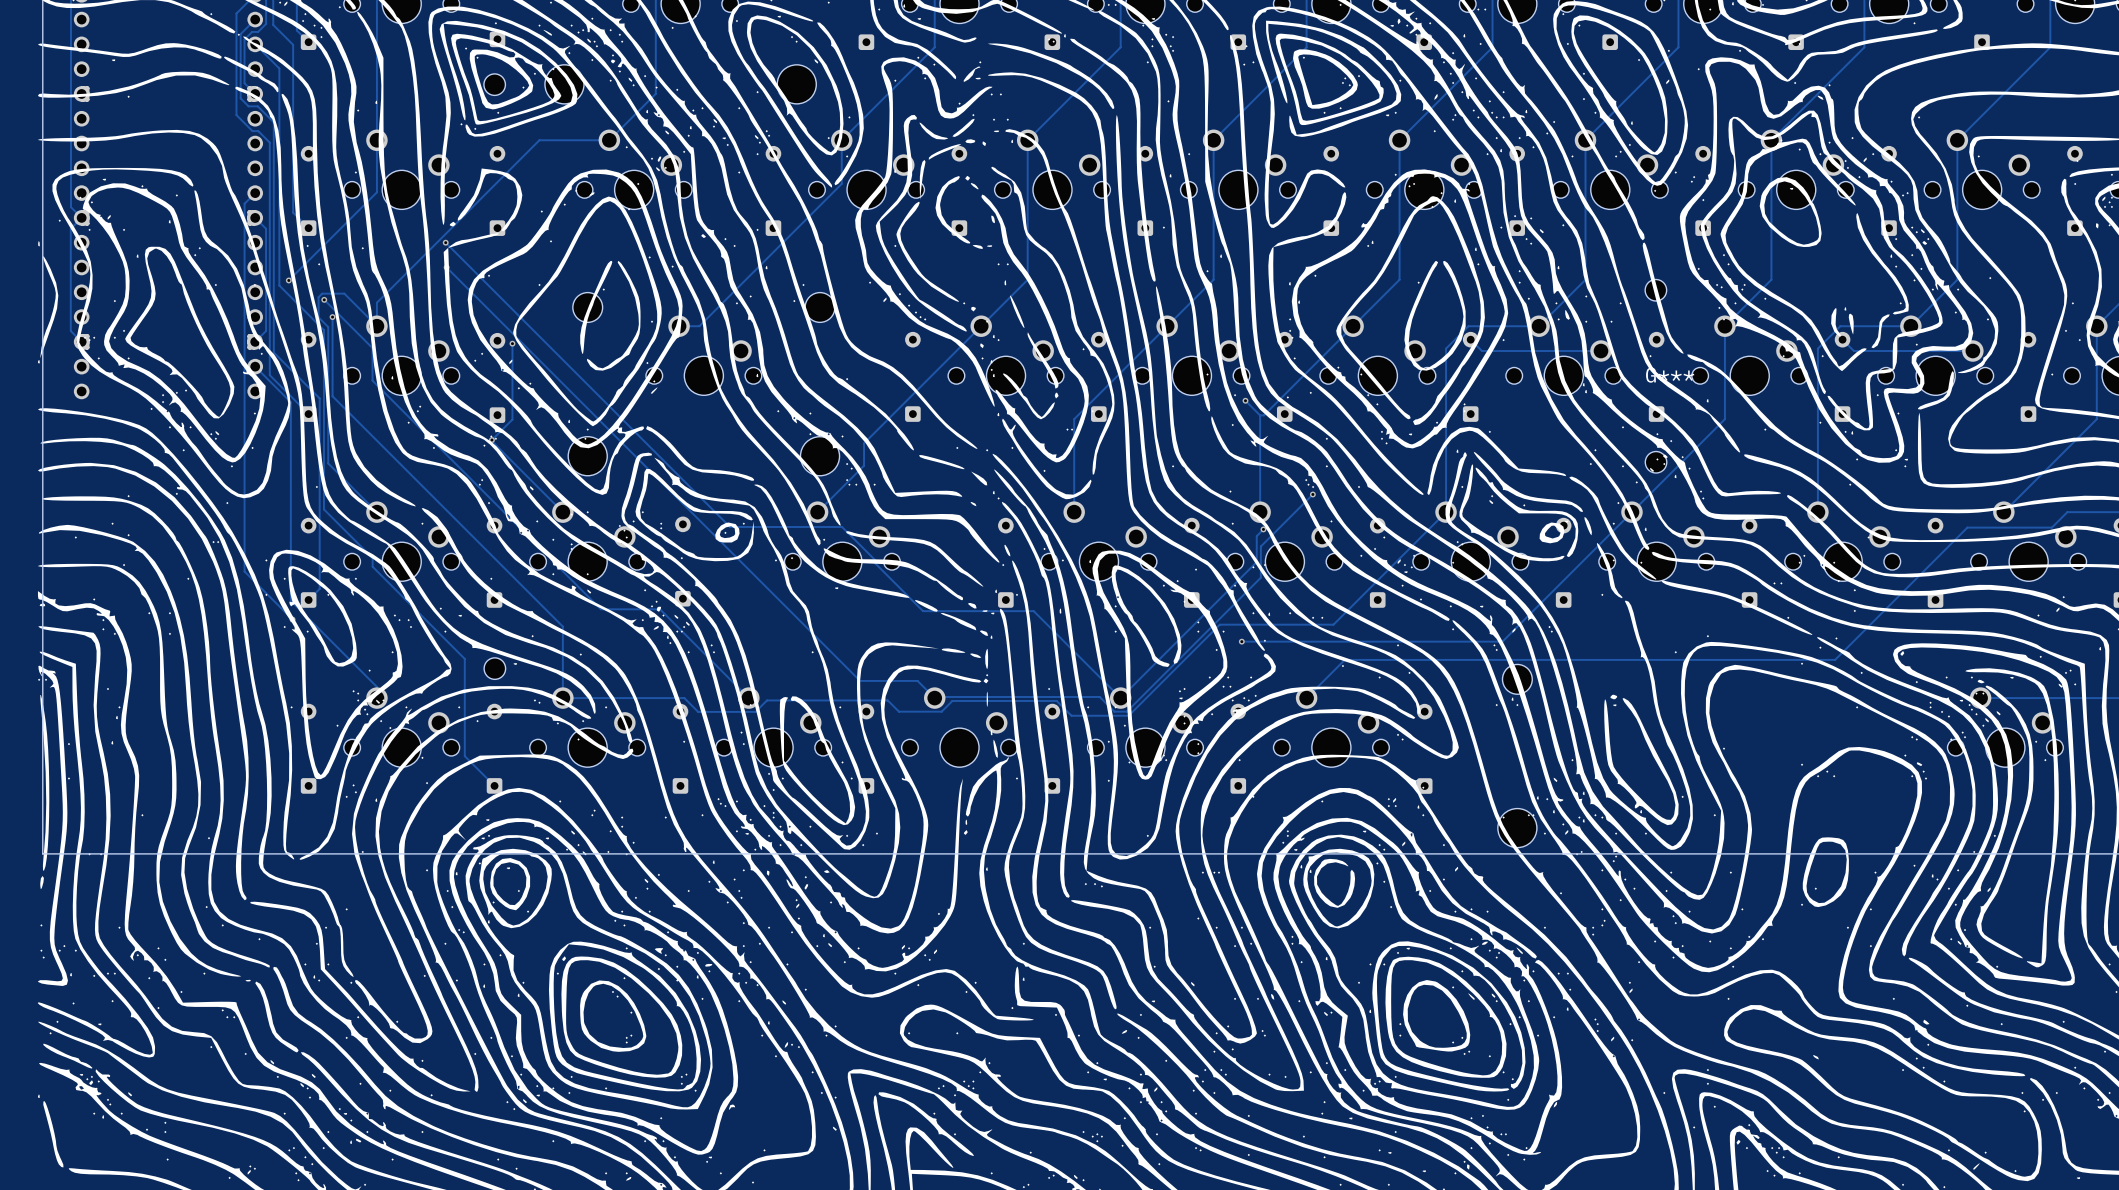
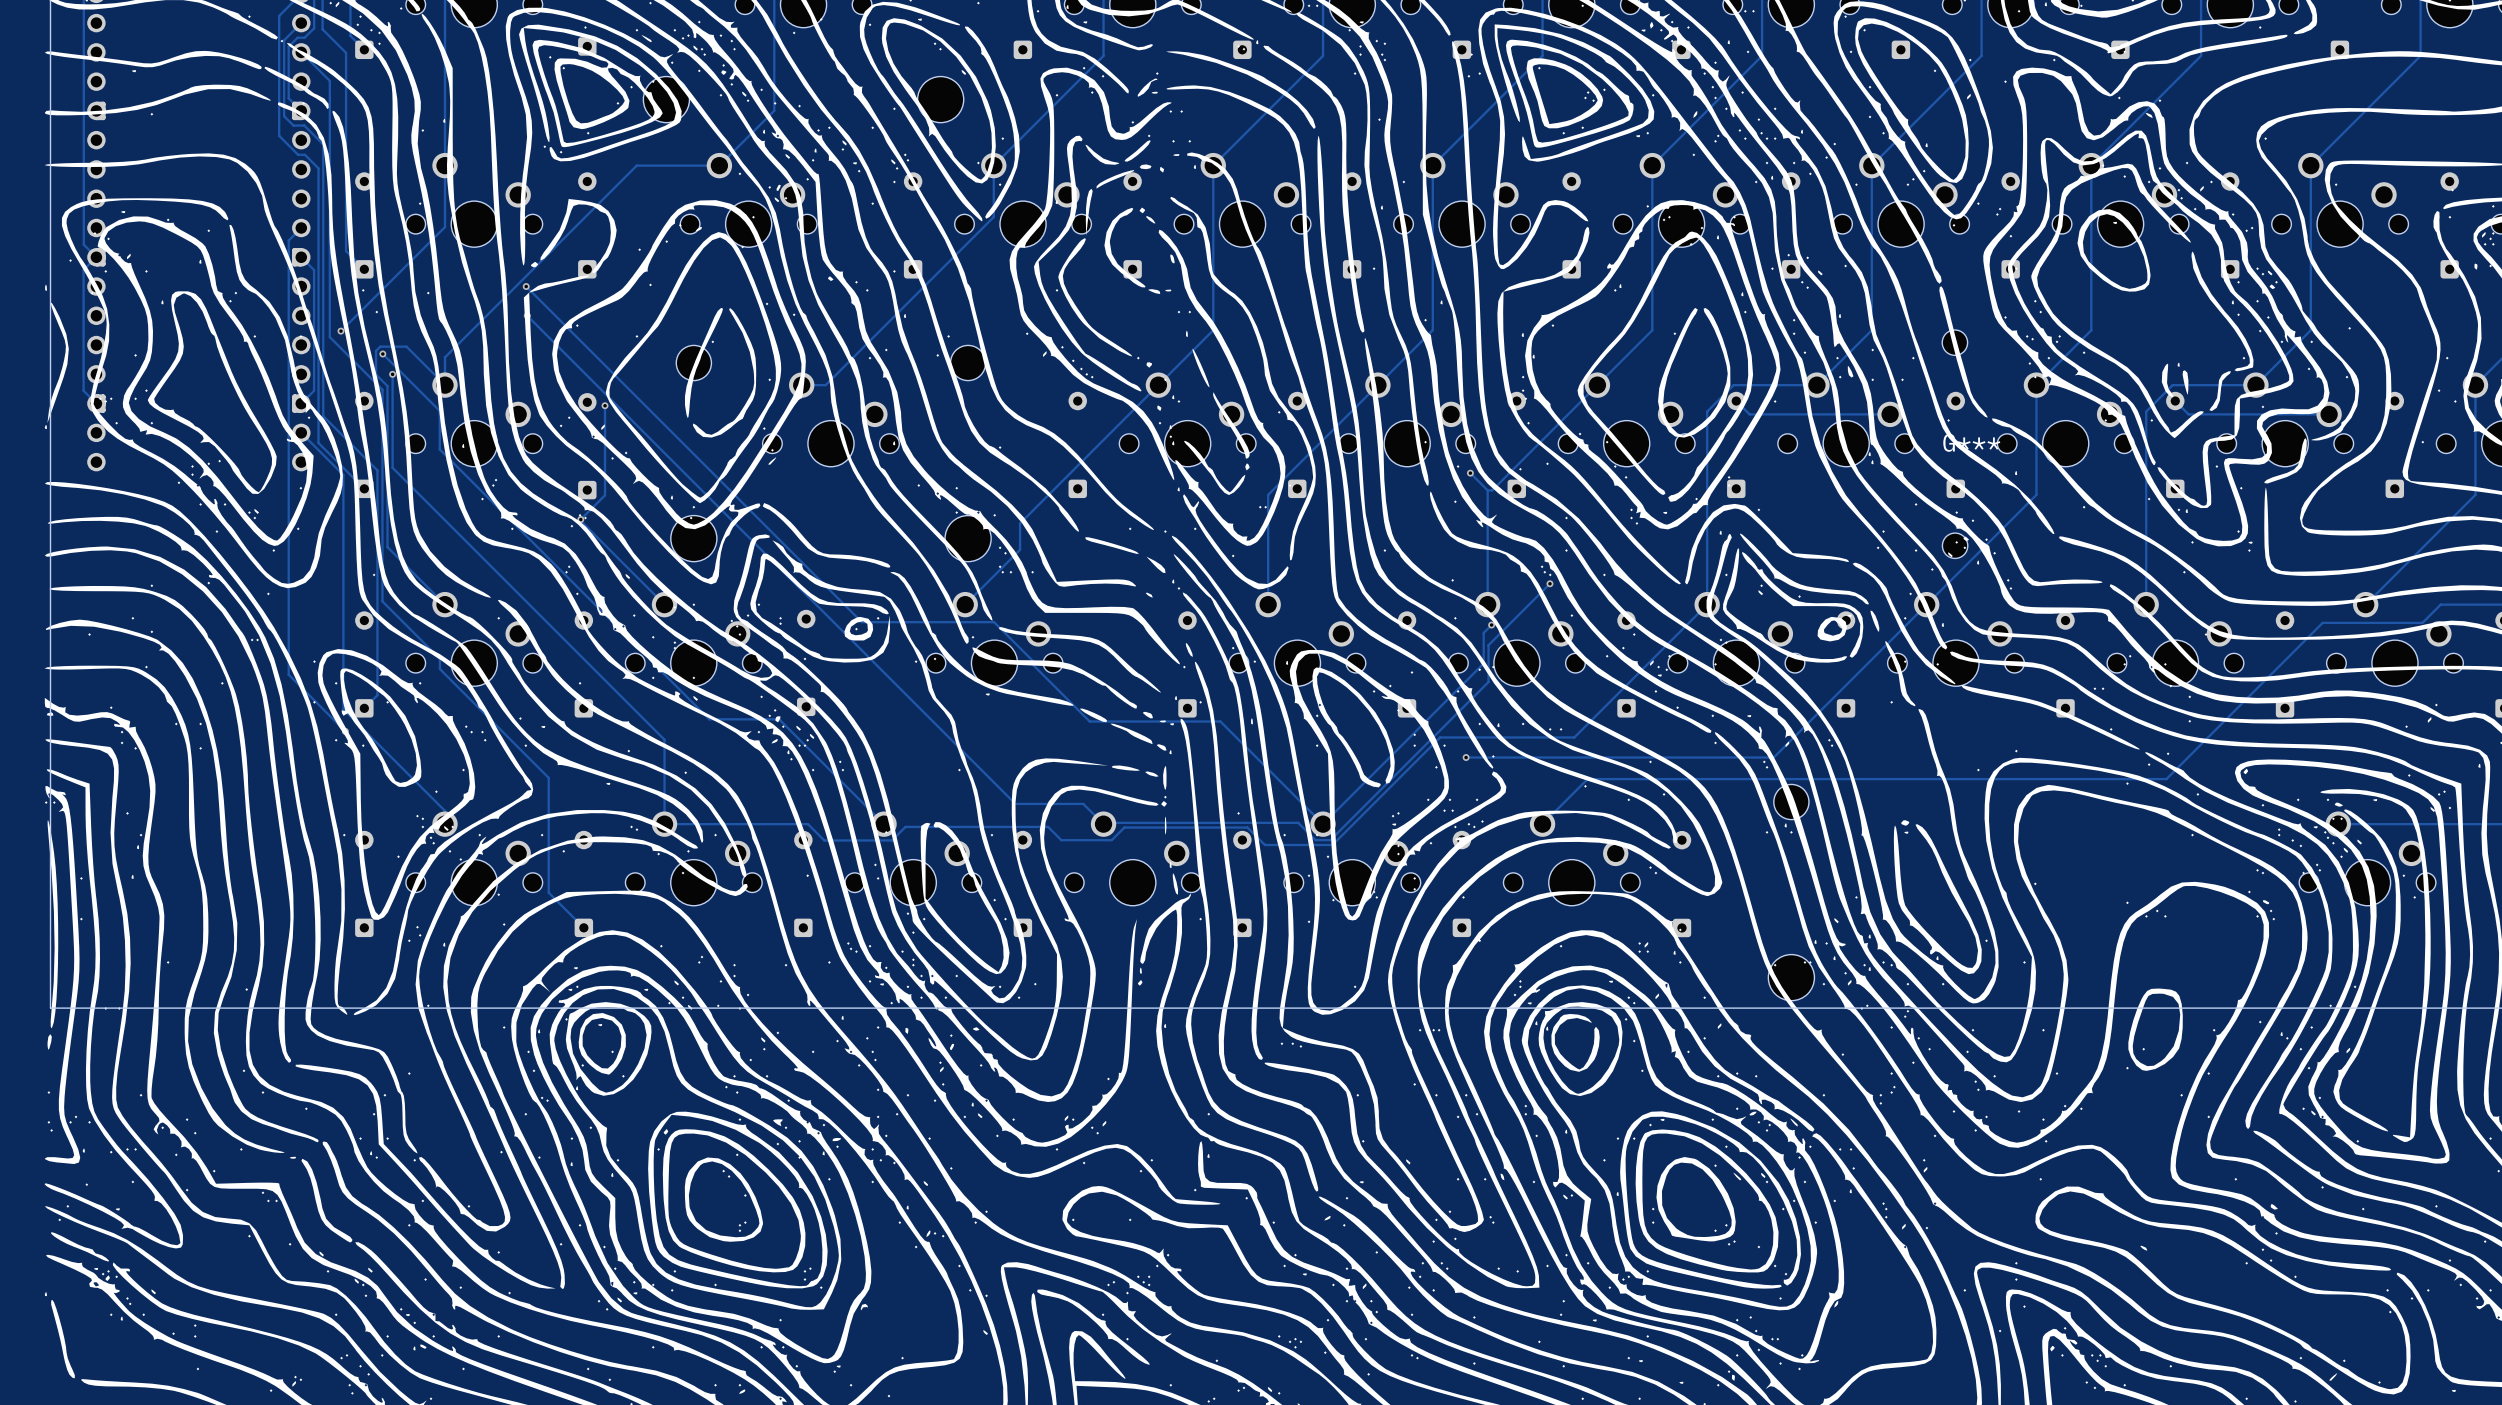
part: (494, 84) -> none
part: (494, 668) -> none

